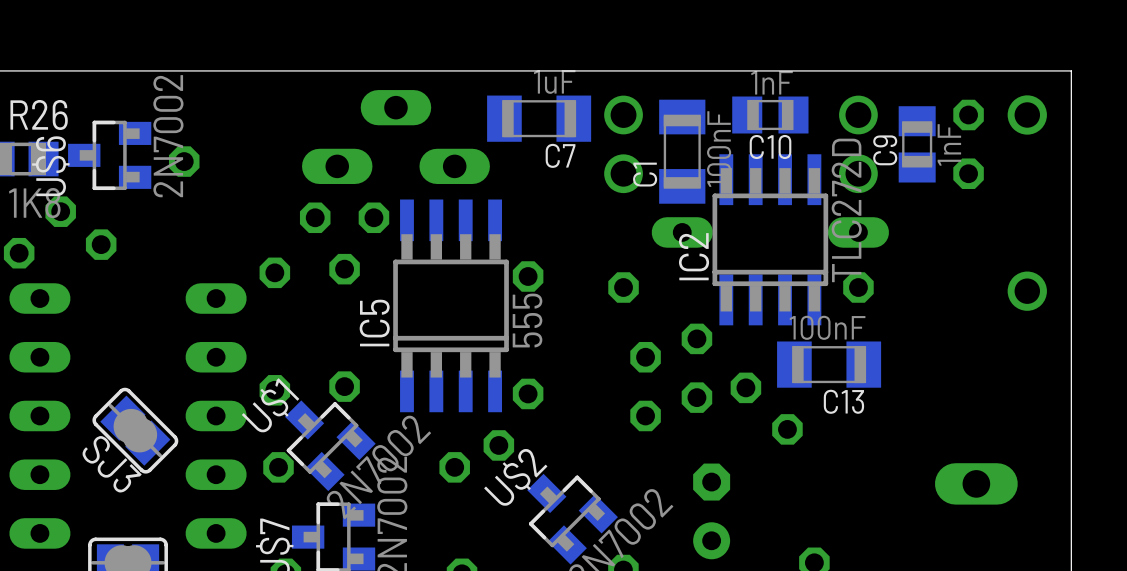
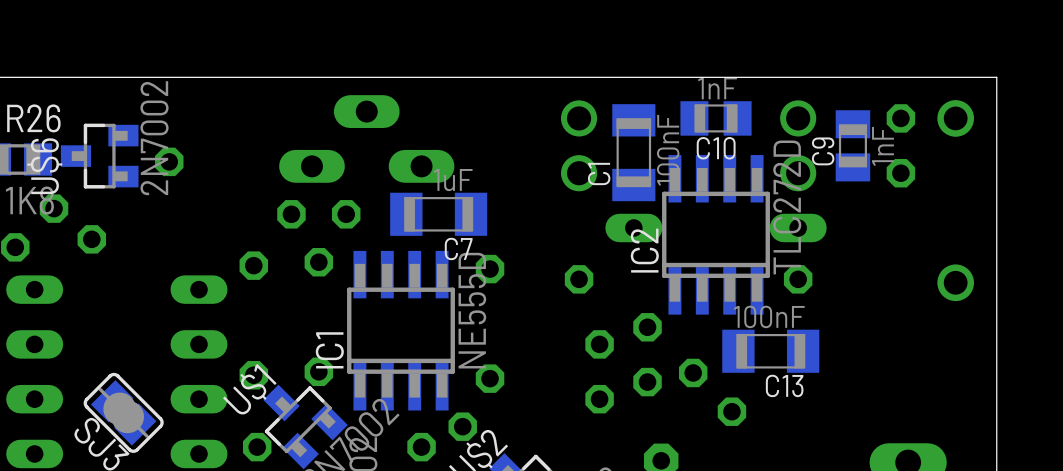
C7 position: (539, 118) -> (438, 214)
IC5: 555 (451, 305) -> none
IC1: none -> NE555D (401, 330)

